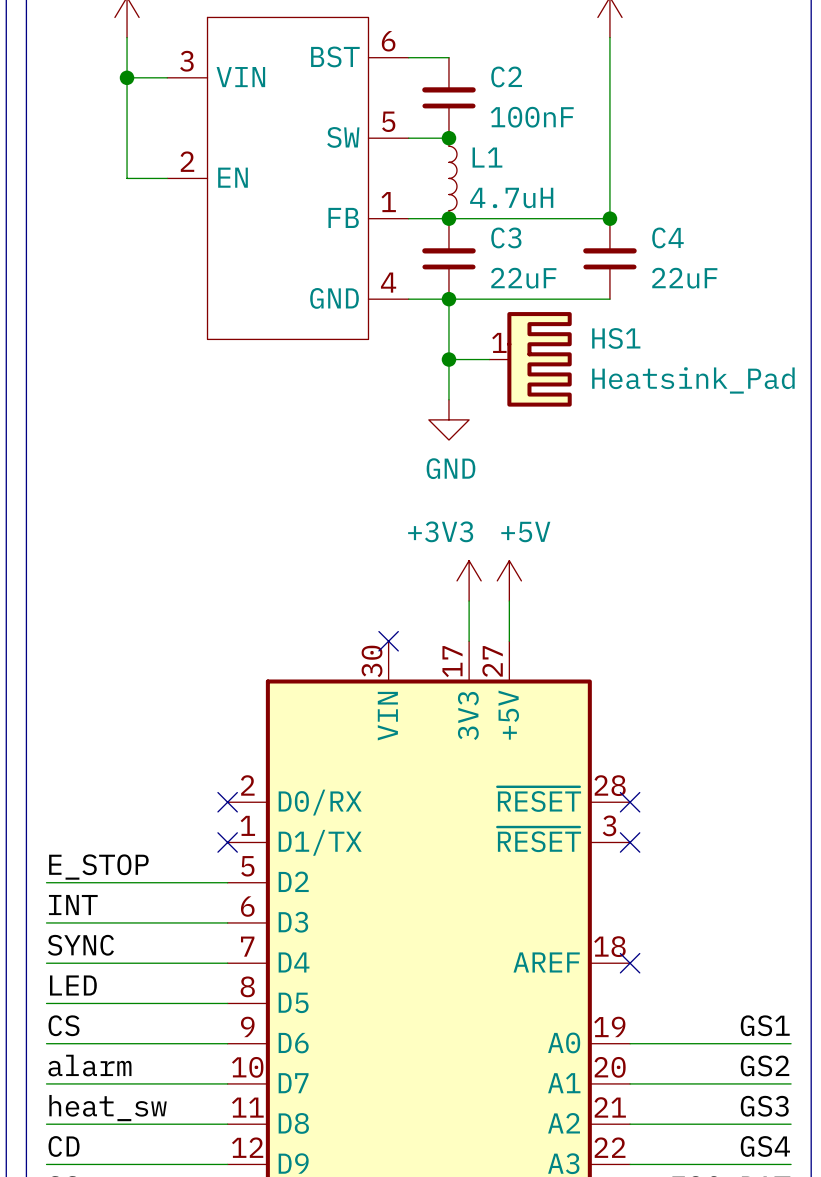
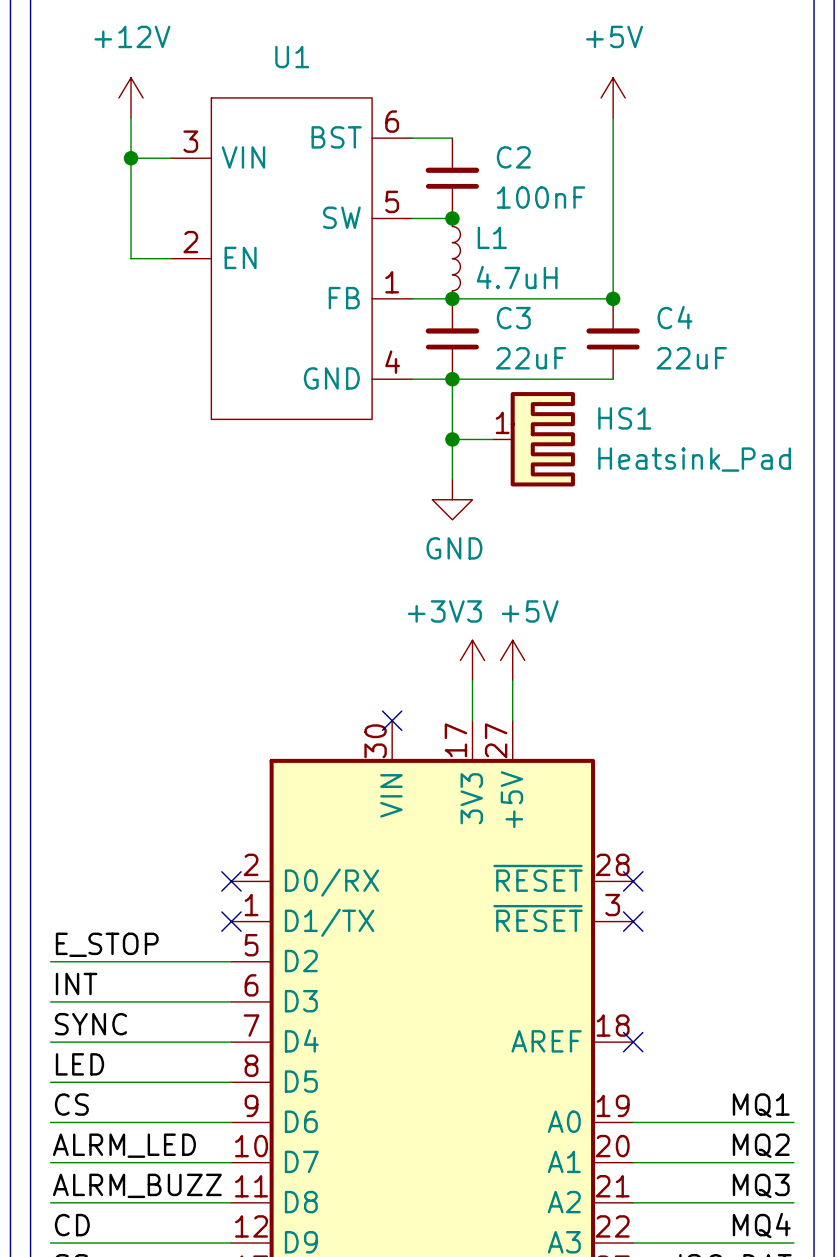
label: GS1 (765, 1025) -> MQ1 (761, 1105)
label: alarm (89, 1065) -> ALRM_LED (124, 1145)
label: GS2 (765, 1065) -> MQ2 (761, 1145)
label: GS3 (764, 1106) -> MQ3 (761, 1185)
label: heat_sw (108, 1108) -> ALRM_BUZZ (137, 1185)
label: GS4 (765, 1146) -> MQ4 (761, 1225)

